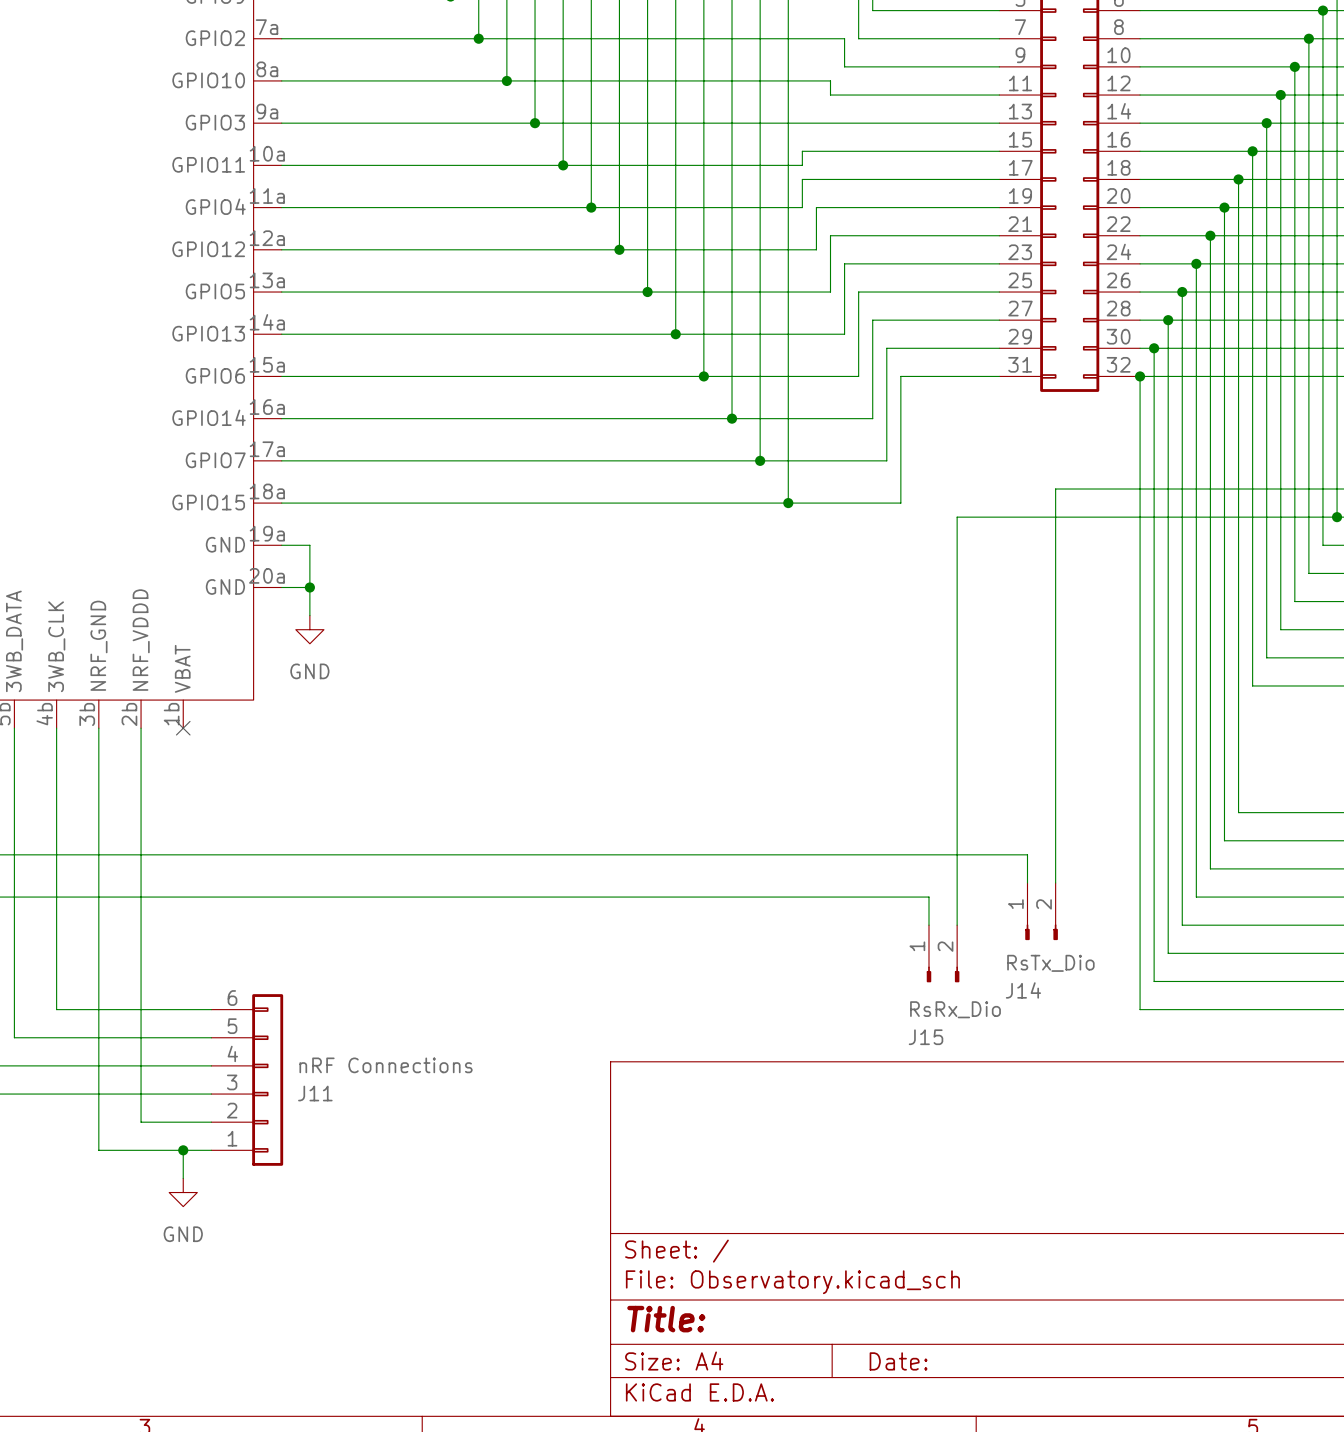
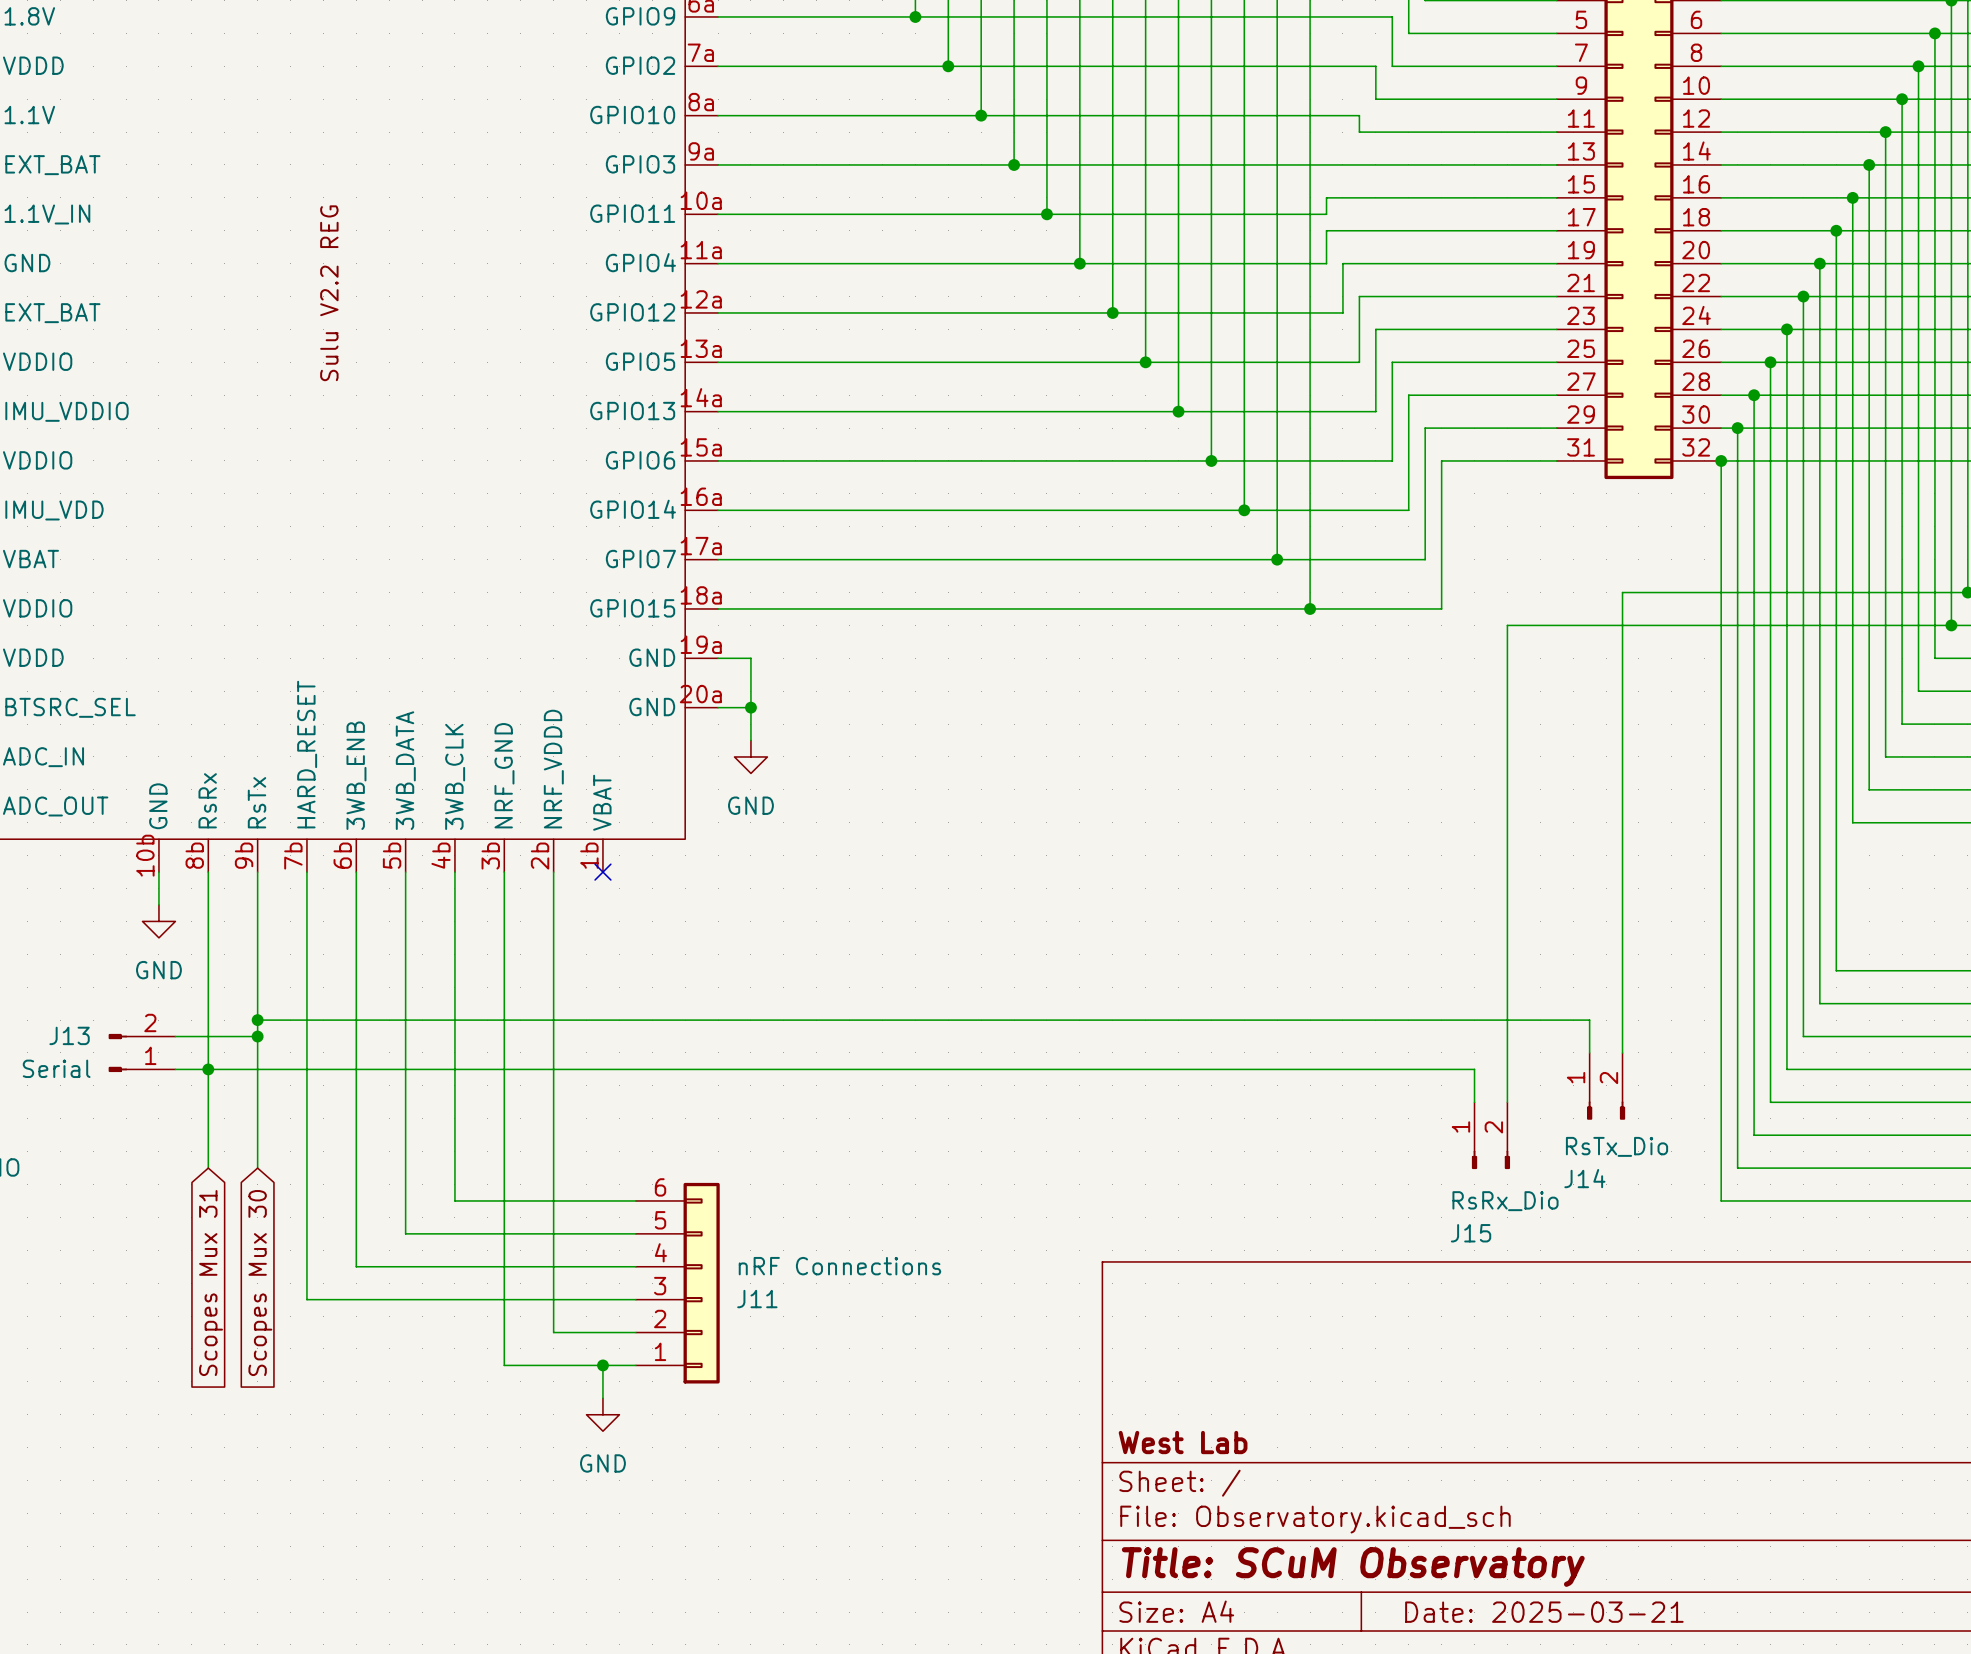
title block: none -> West Lab (1183, 1442)
title block: Title: (666, 1319) -> Title: SCuM Observatory (1353, 1567)
title block: Date: (898, 1361) -> Date: 2025-03-21 (1544, 1612)

